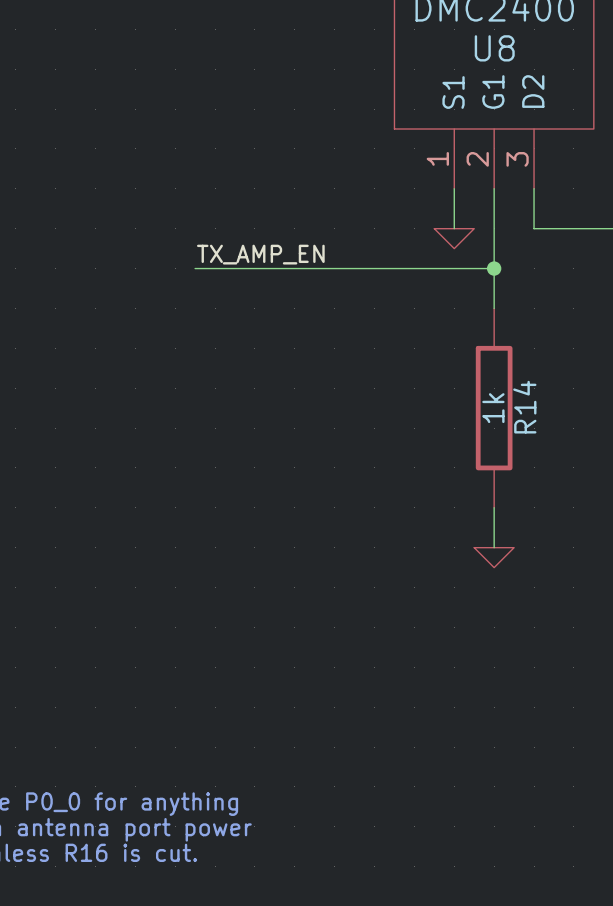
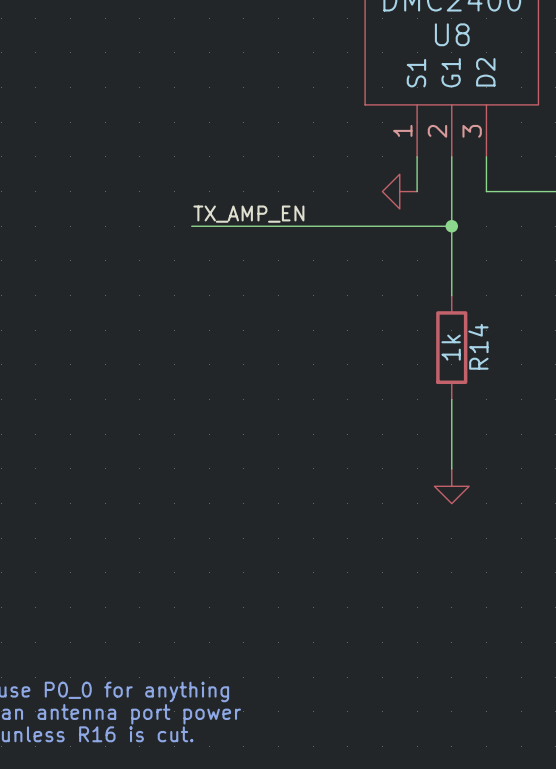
power symbol: none -> (399, 191)
power symbol: (454, 238) -> none
R14 symbol: [475, 308, 513, 508] -> [436, 295, 468, 400]
power symbol shape: [474, 547, 515, 568] -> [434, 468, 470, 504]

